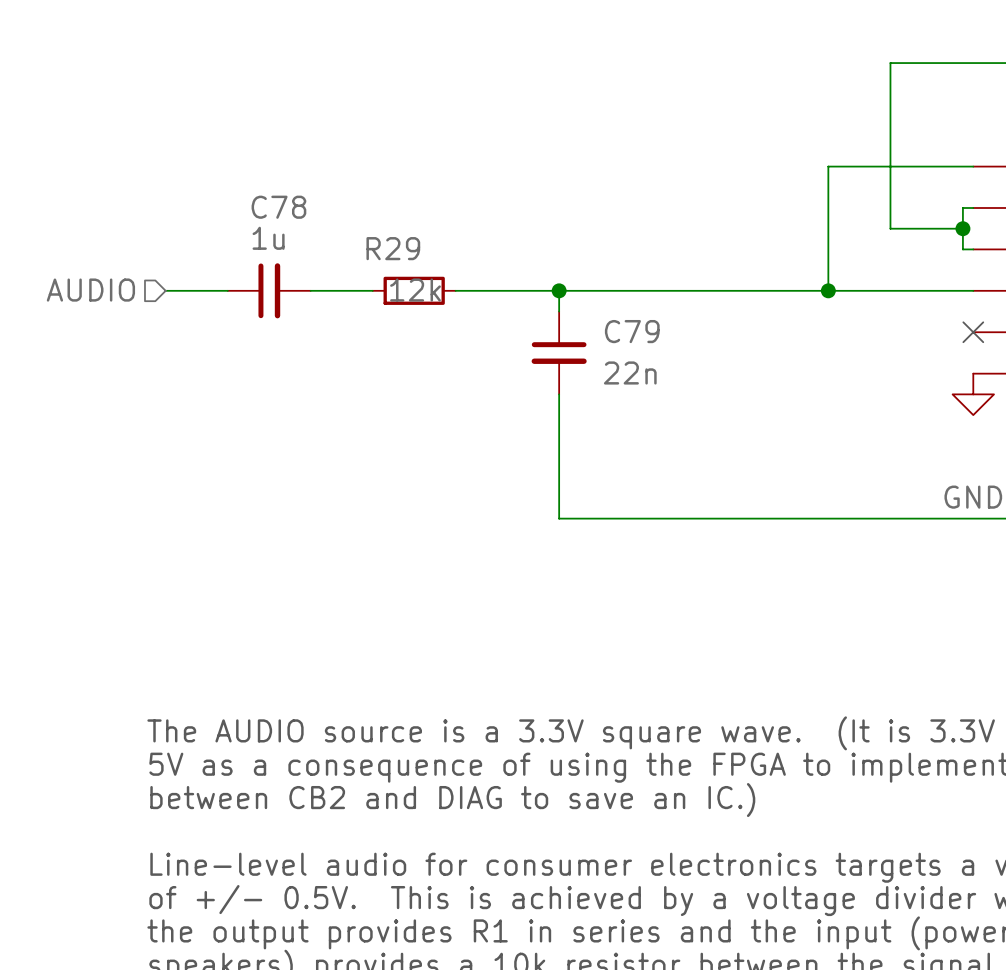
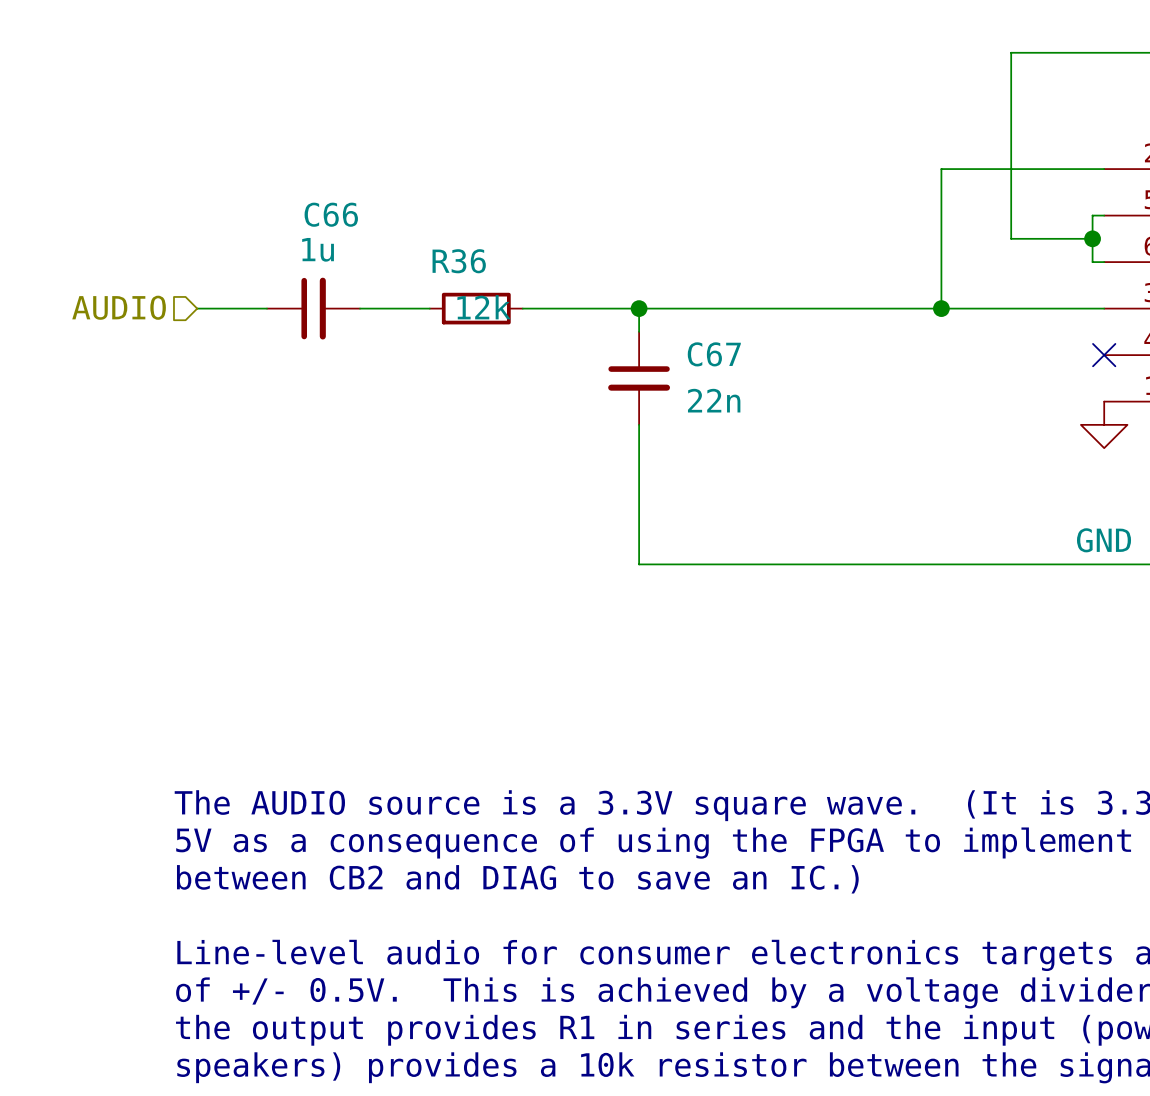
C78 name: C78 (278, 207) -> C66 (331, 214)
R29 name: R29 (393, 248) -> R36 (459, 261)
C79 name: C79 (632, 331) -> C67 (714, 354)

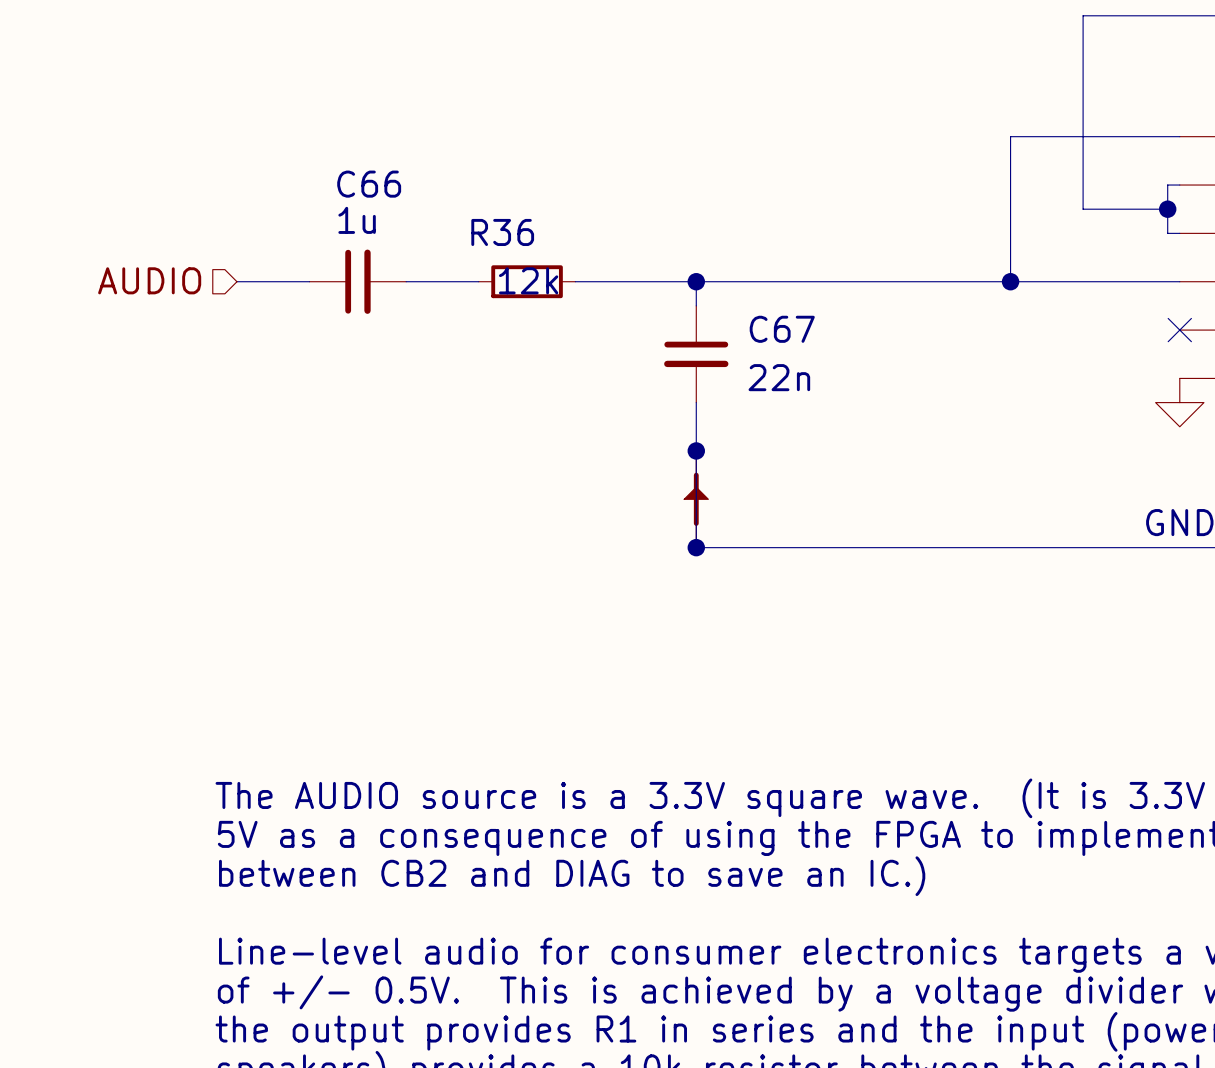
junction: none -> (696, 450)
part: none -> (696, 499)
junction: none -> (696, 547)

